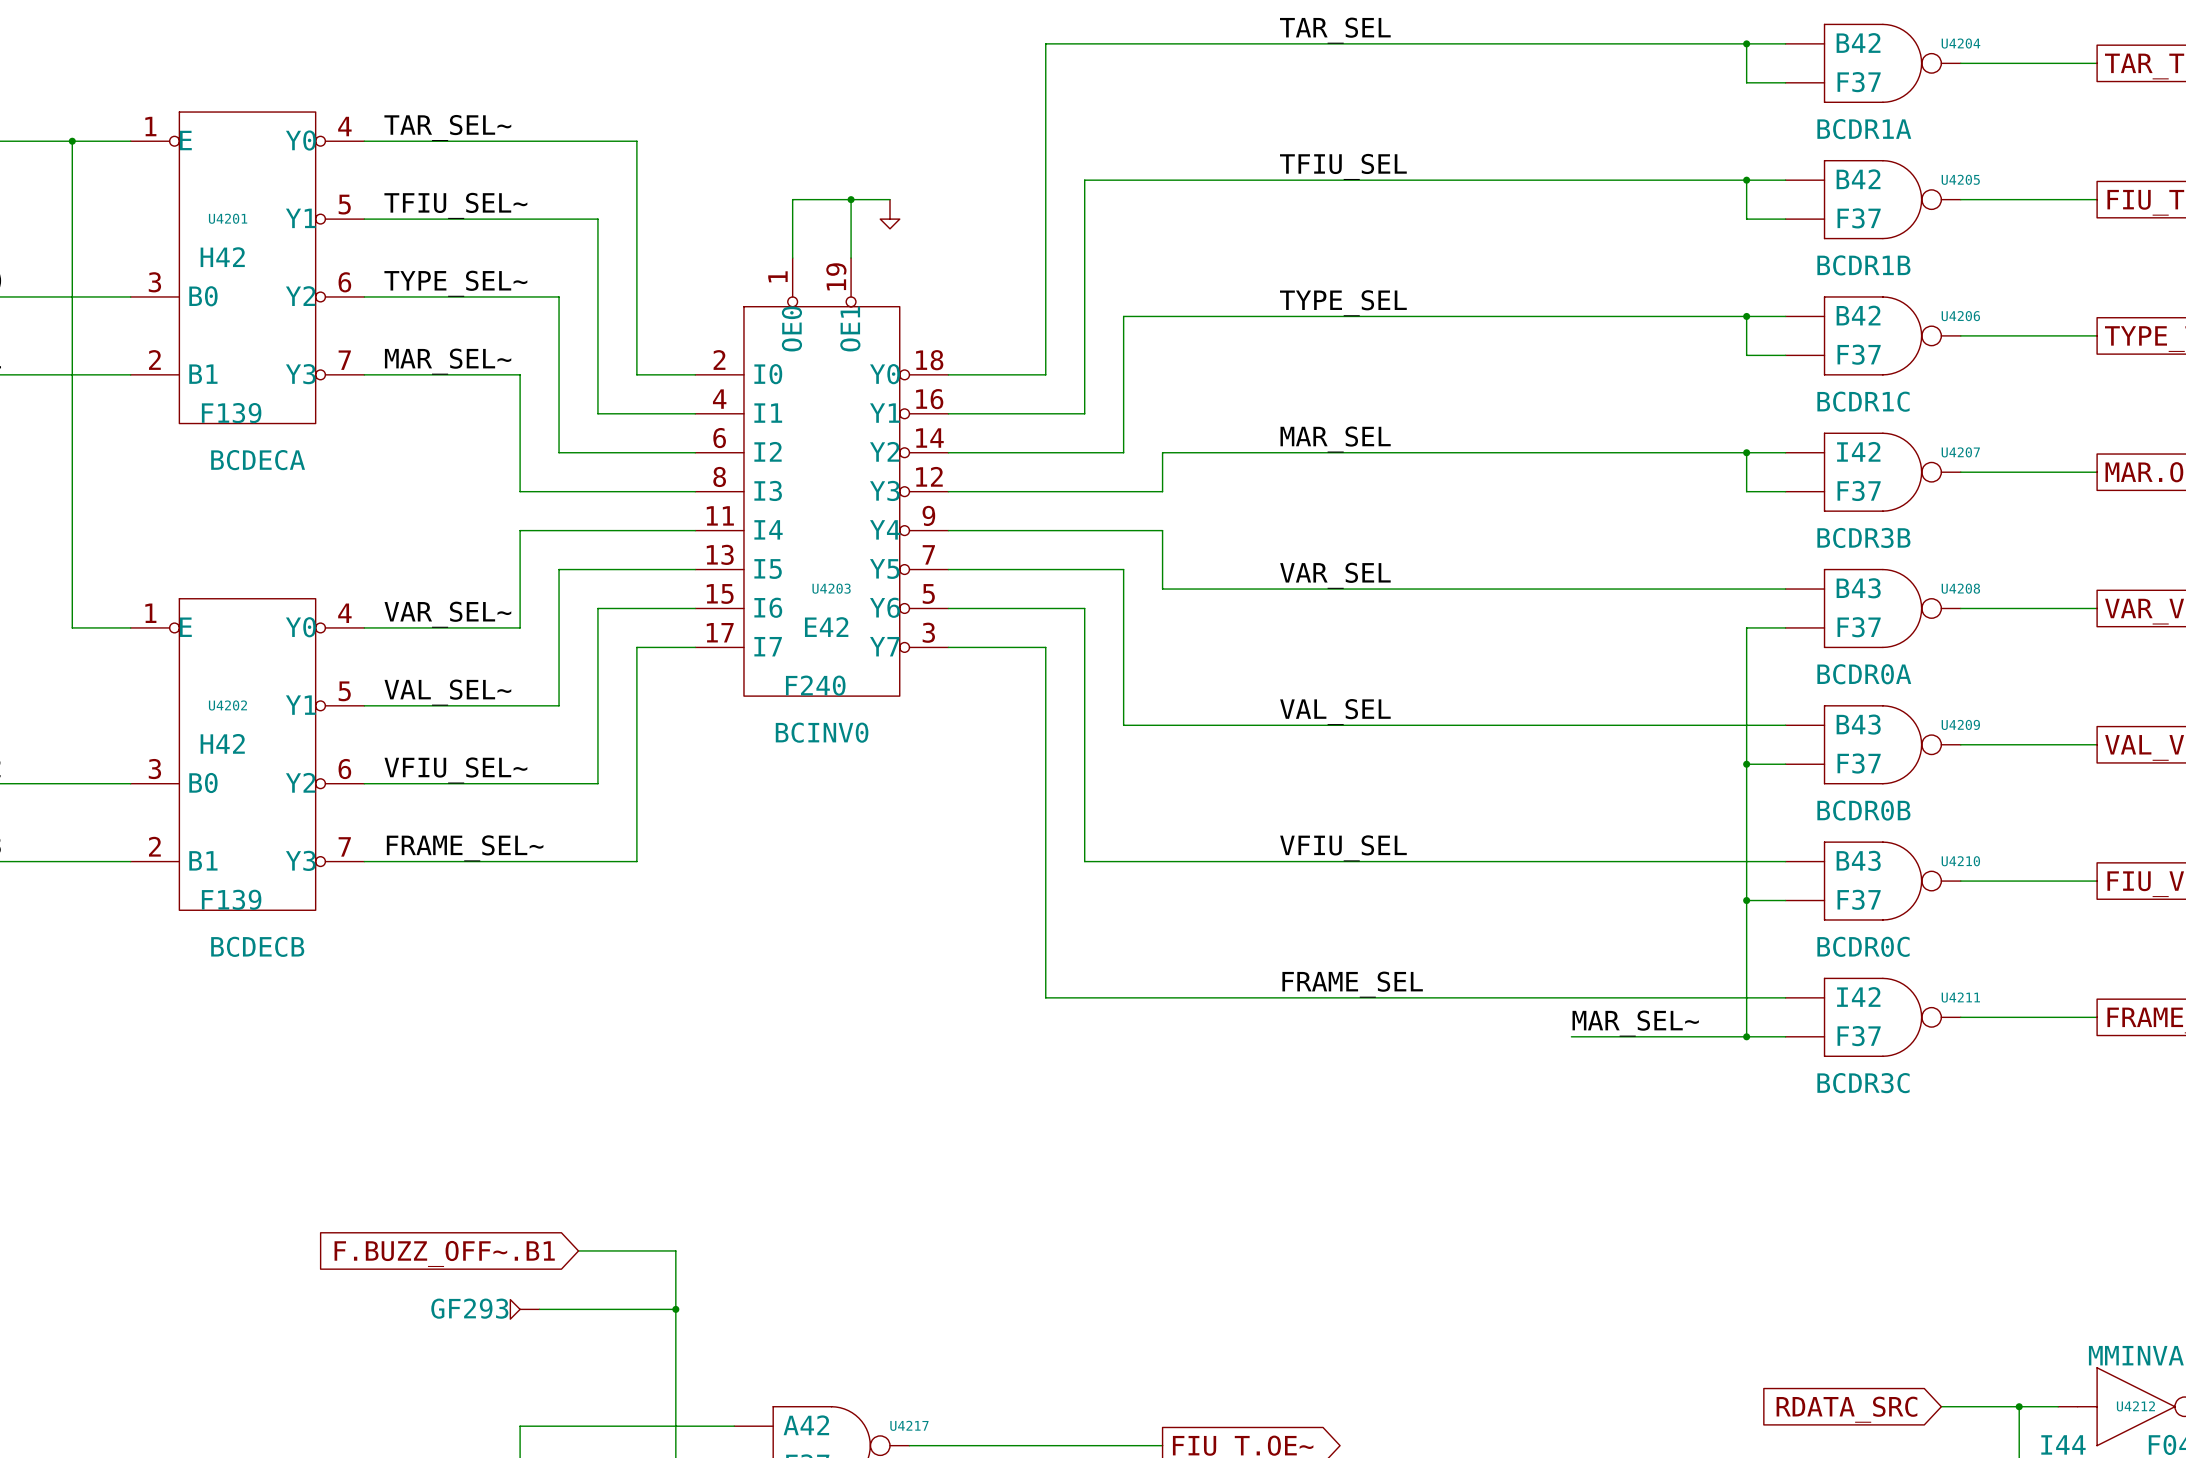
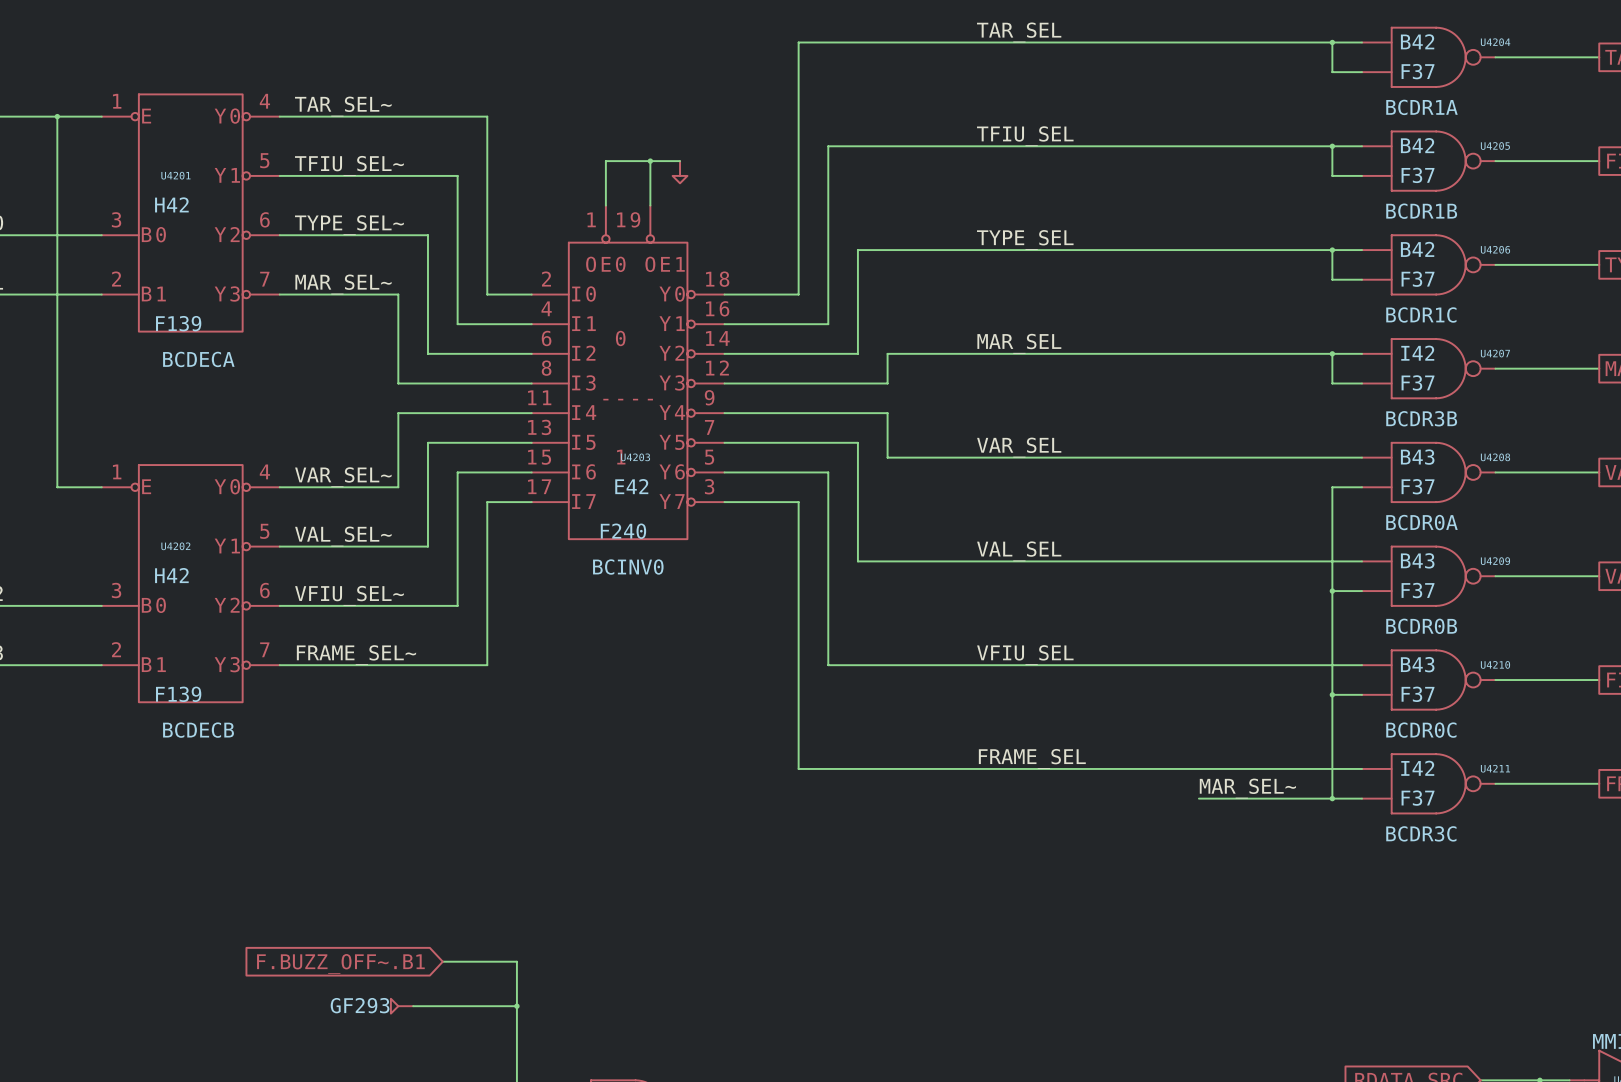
U4201 symbol: [130, 112, 365, 424] -> [101, 94, 280, 332]
U4203 symbol: [695, 258, 949, 697] -> [531, 205, 725, 540]
U4202 symbol: [130, 598, 365, 911] -> [101, 465, 280, 703]

